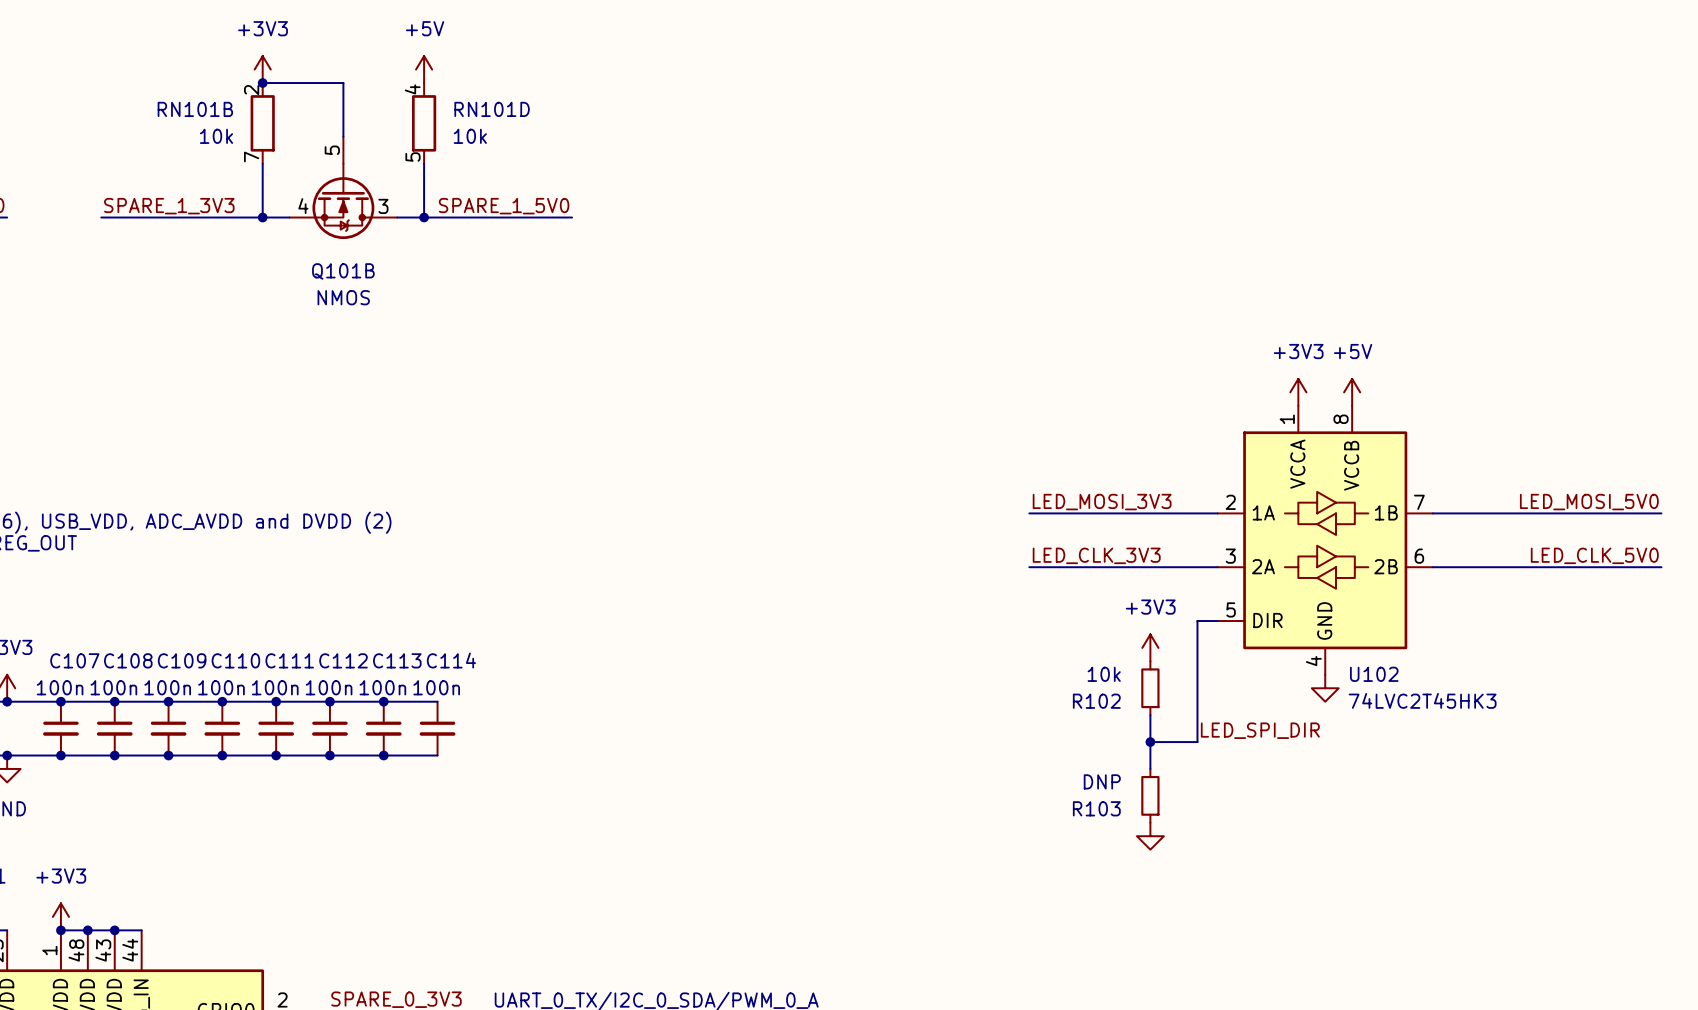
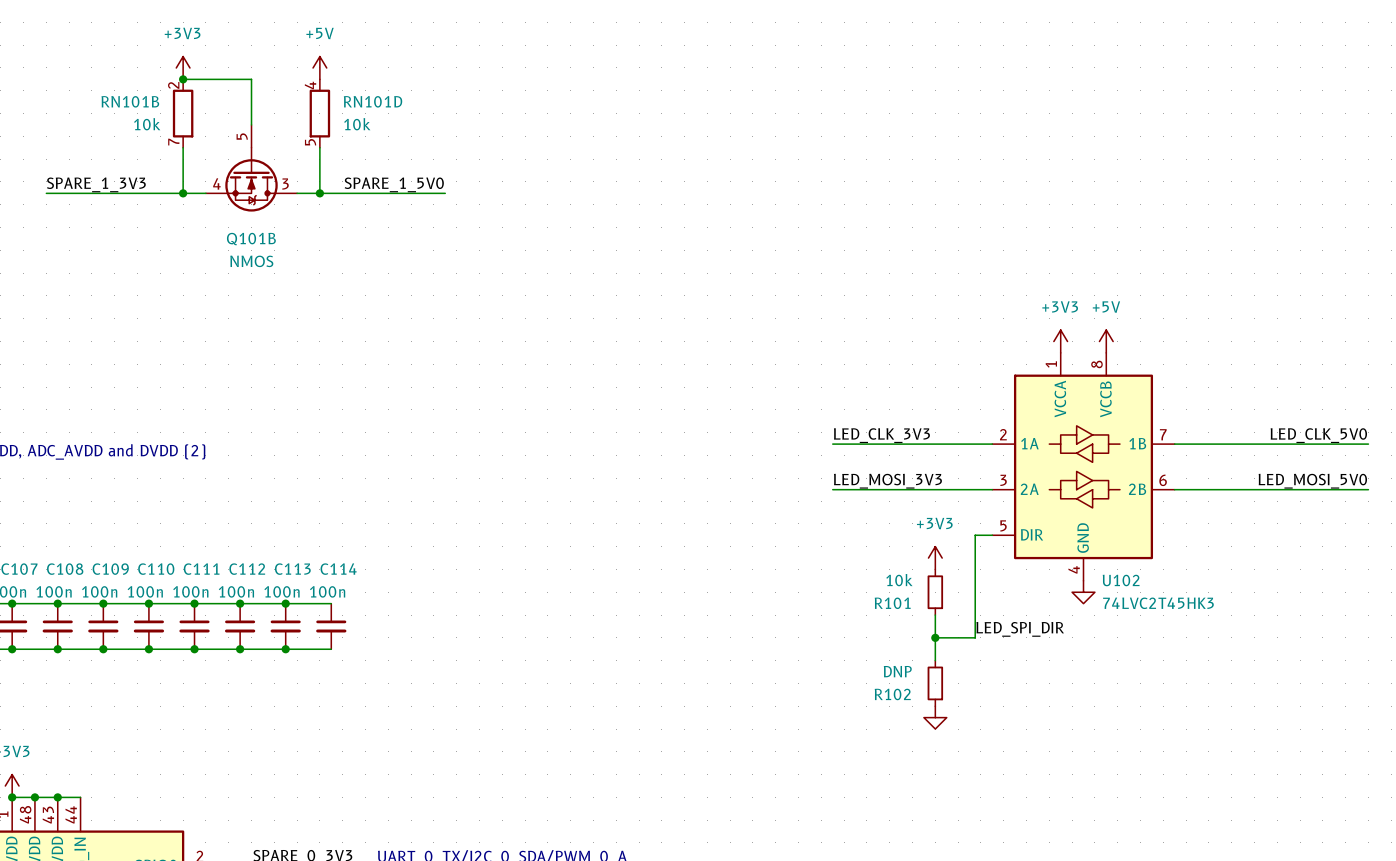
label: LED_MOSI_3V3 (1102, 502) -> LED_CLK_3V3 (881, 435)
label: LED_MOSI_5V0 (1589, 502) -> LED_CLK_5V0 (1318, 435)
label: LED_CLK_3V3 (1096, 555) -> LED_MOSI_3V3 (887, 481)
label: LED_CLK_5V0 (1594, 555) -> LED_MOSI_5V0 (1312, 481)
R102 name: R102 (1096, 701) -> R101 (892, 603)
R103 name: R103 (1096, 808) -> R102 (892, 694)

